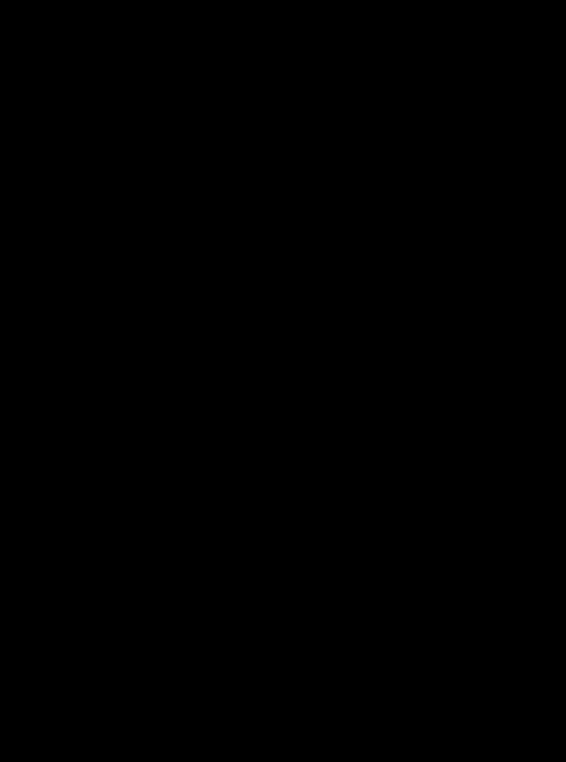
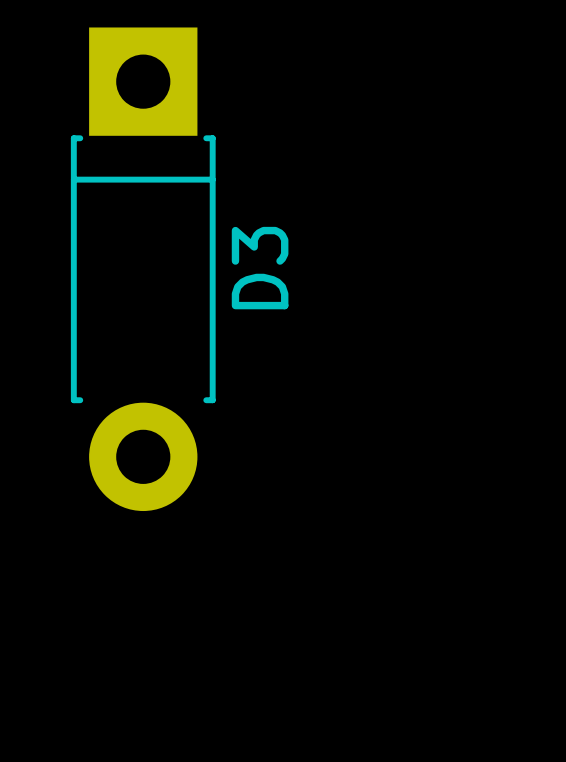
D3: none -> (143, 269)

